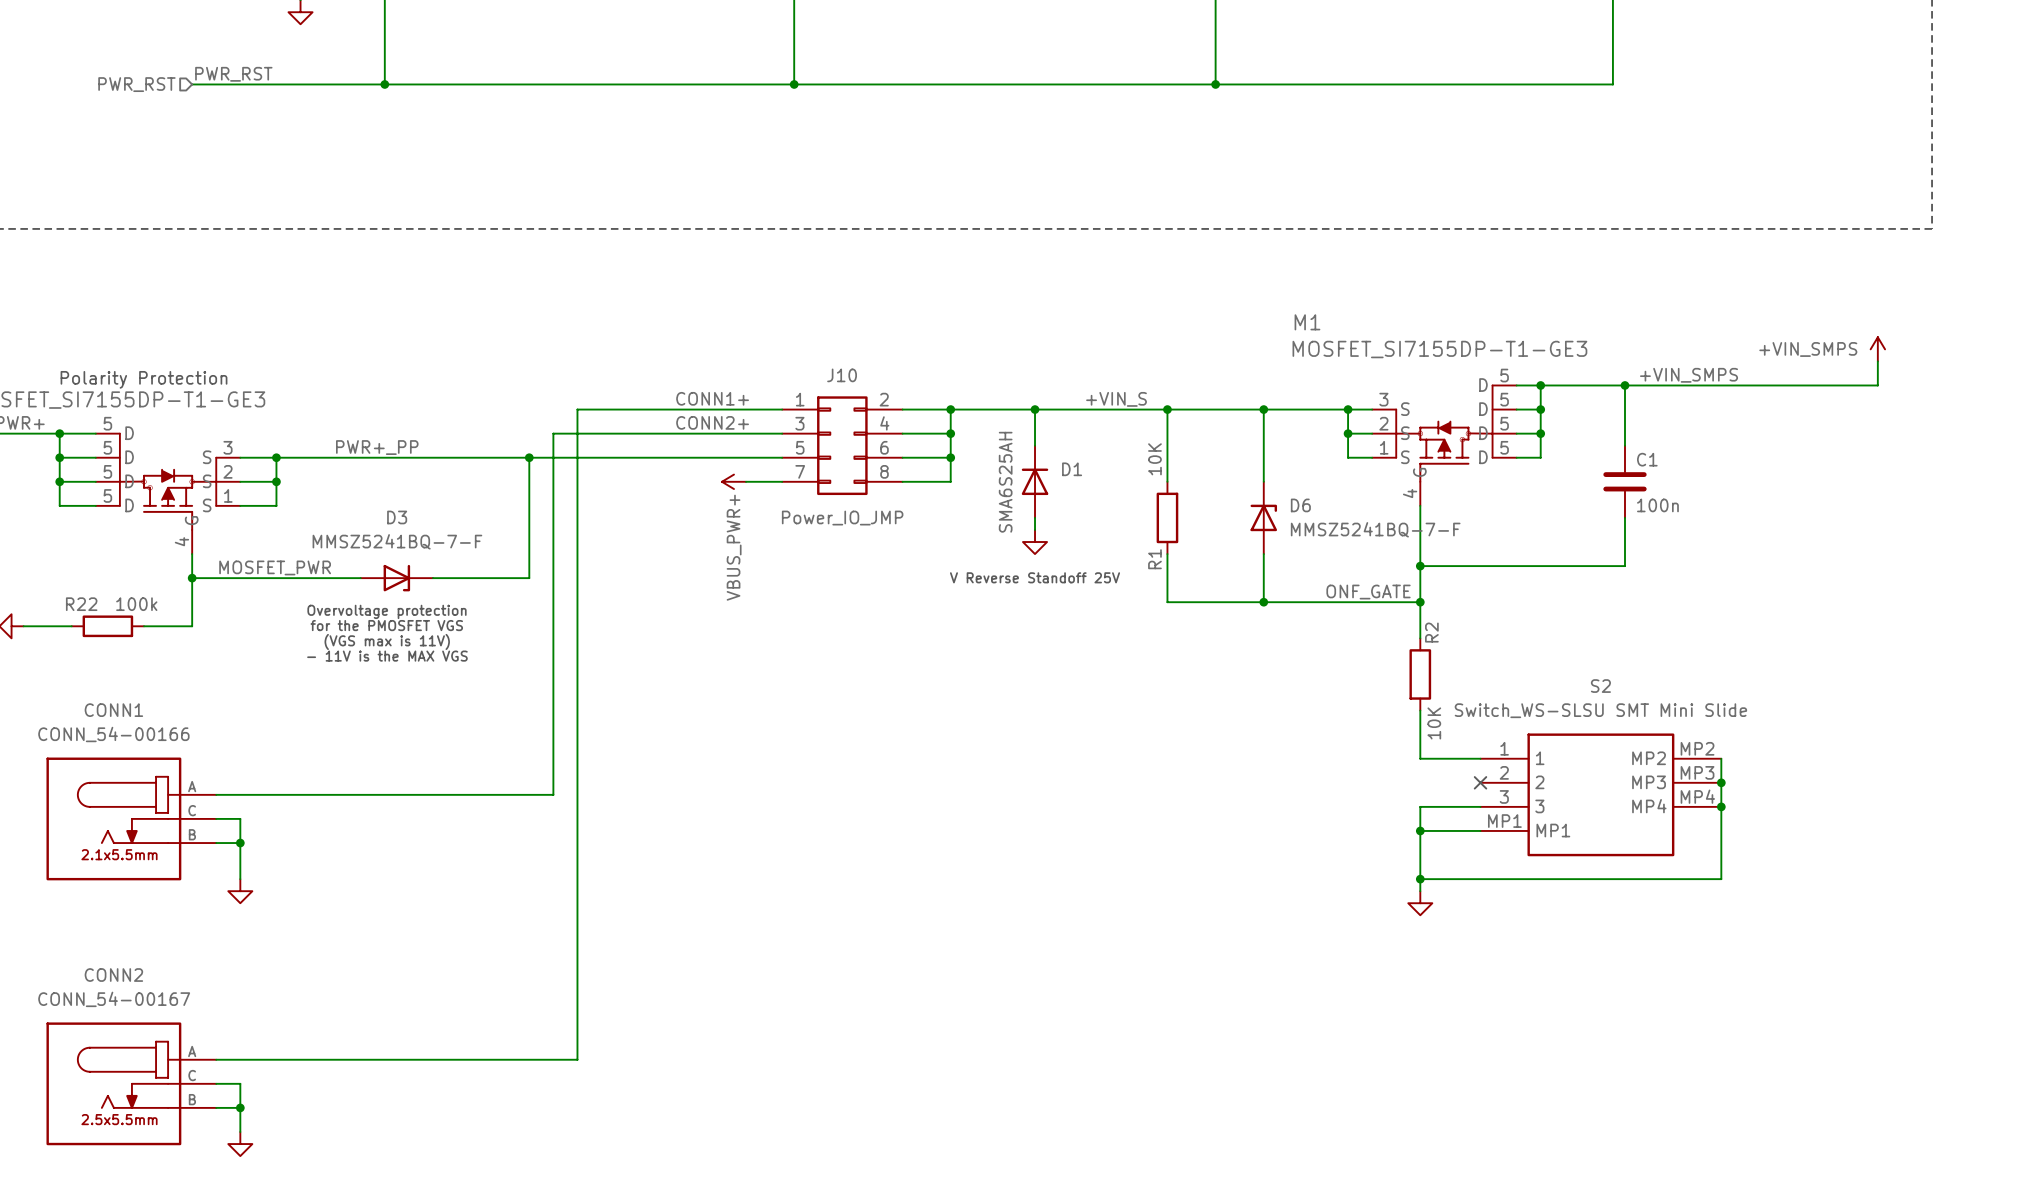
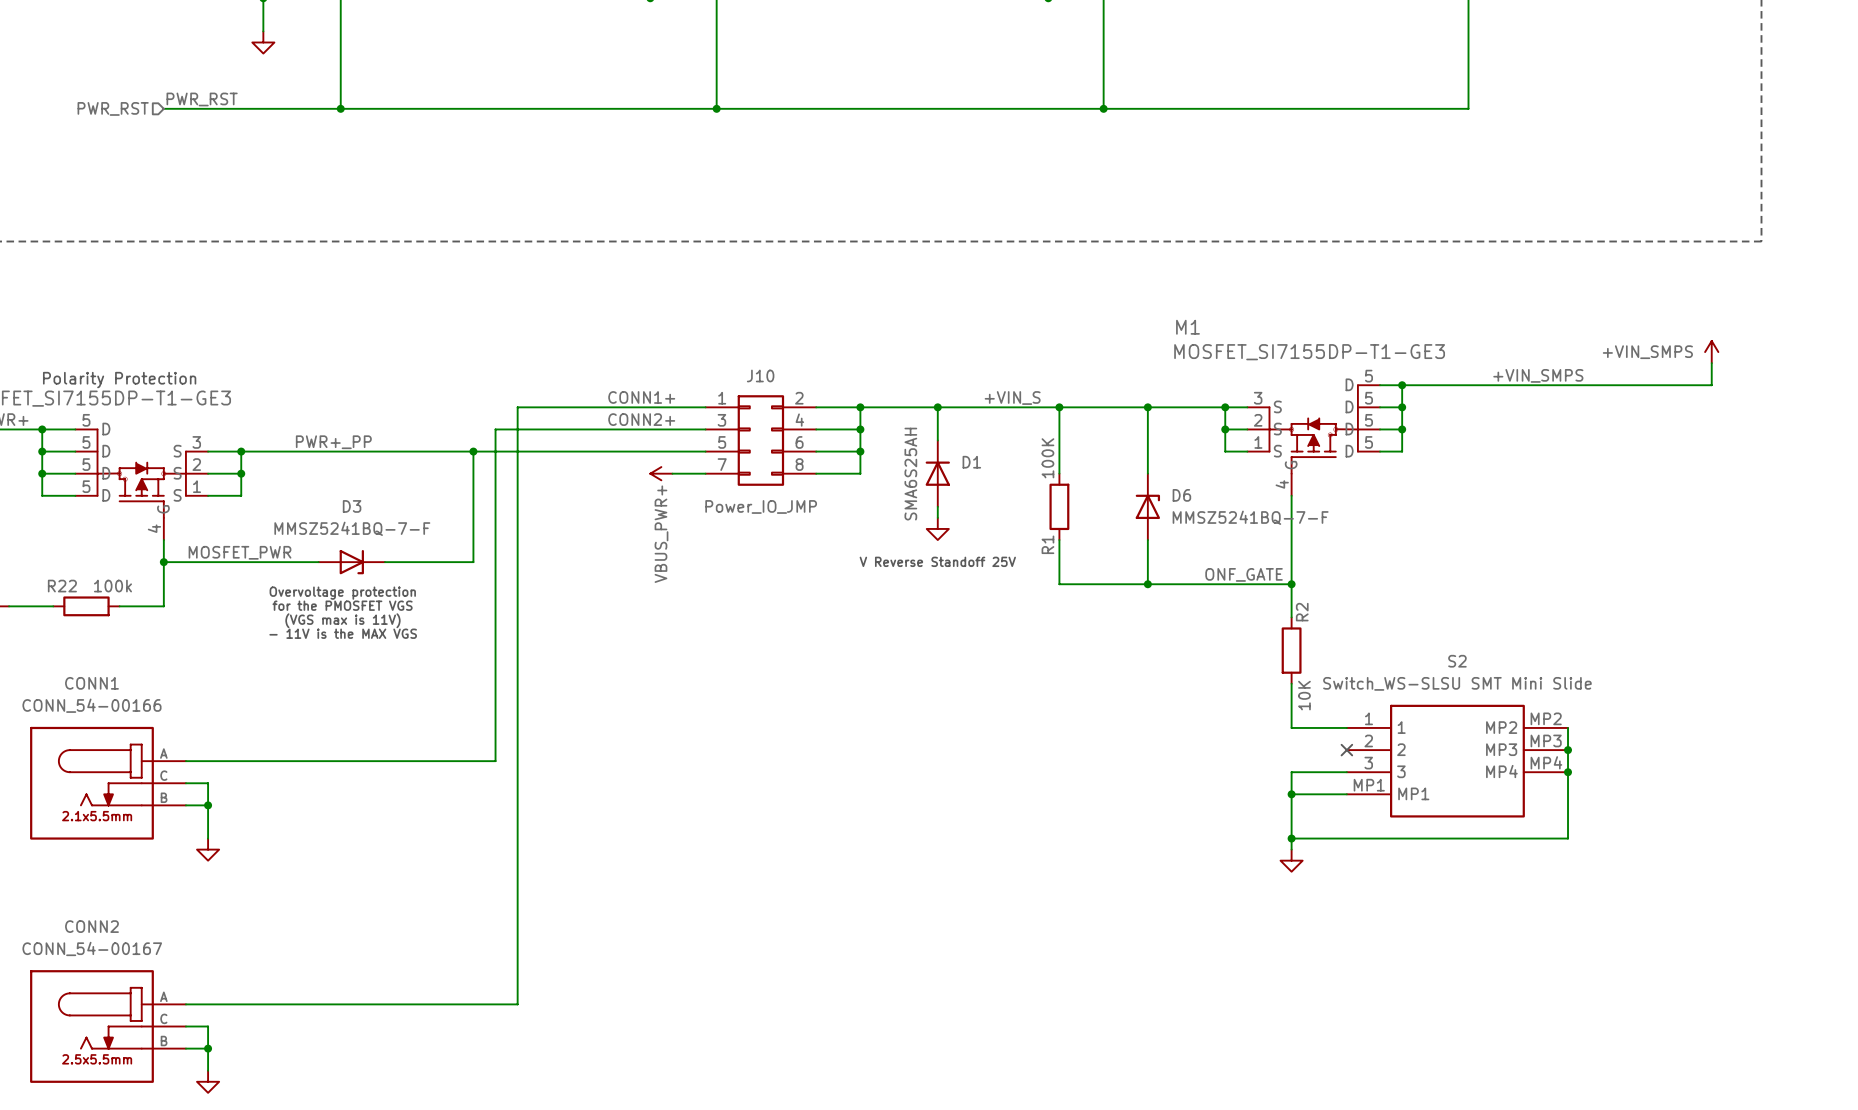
wire: (1624, 385) (1624, 445) -> none
junction: (1624, 385) -> none
R1 value: 10K (1154, 459) -> 100K (1047, 458)
C1: 100n (1624, 481) -> none
wire: (1624, 517) (1624, 566) (1420, 566) -> none
junction: (1420, 566) -> none

